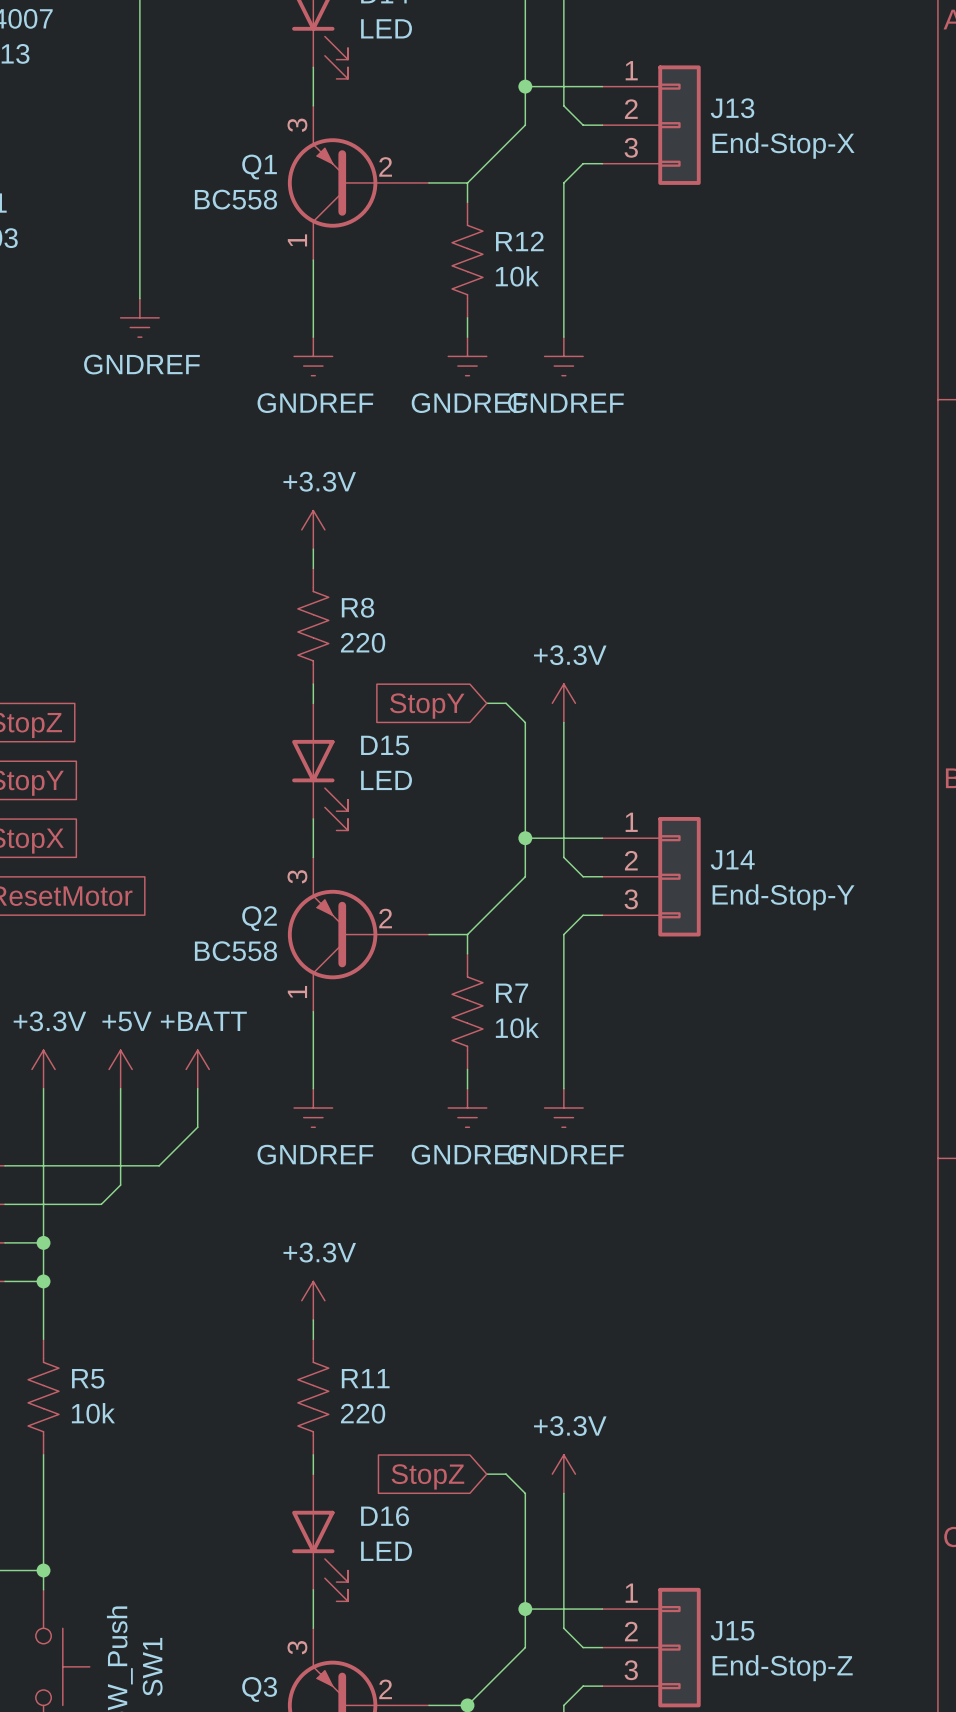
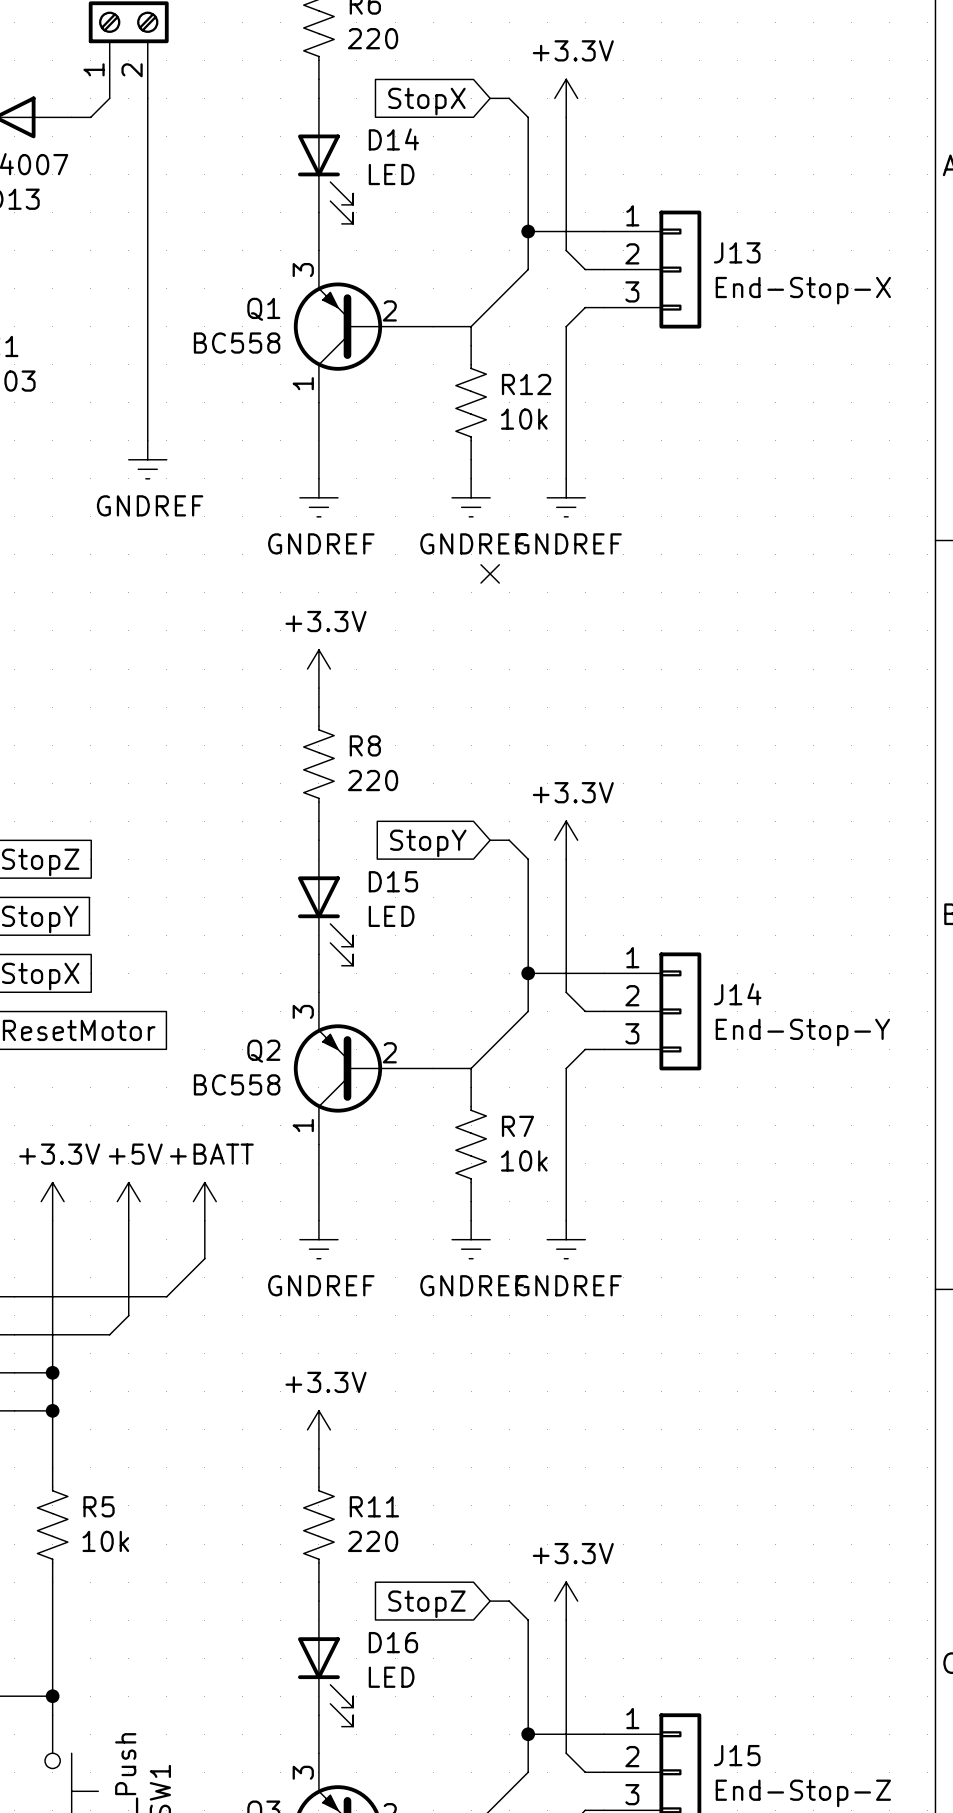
no-connect mark: none -> (490, 573)

